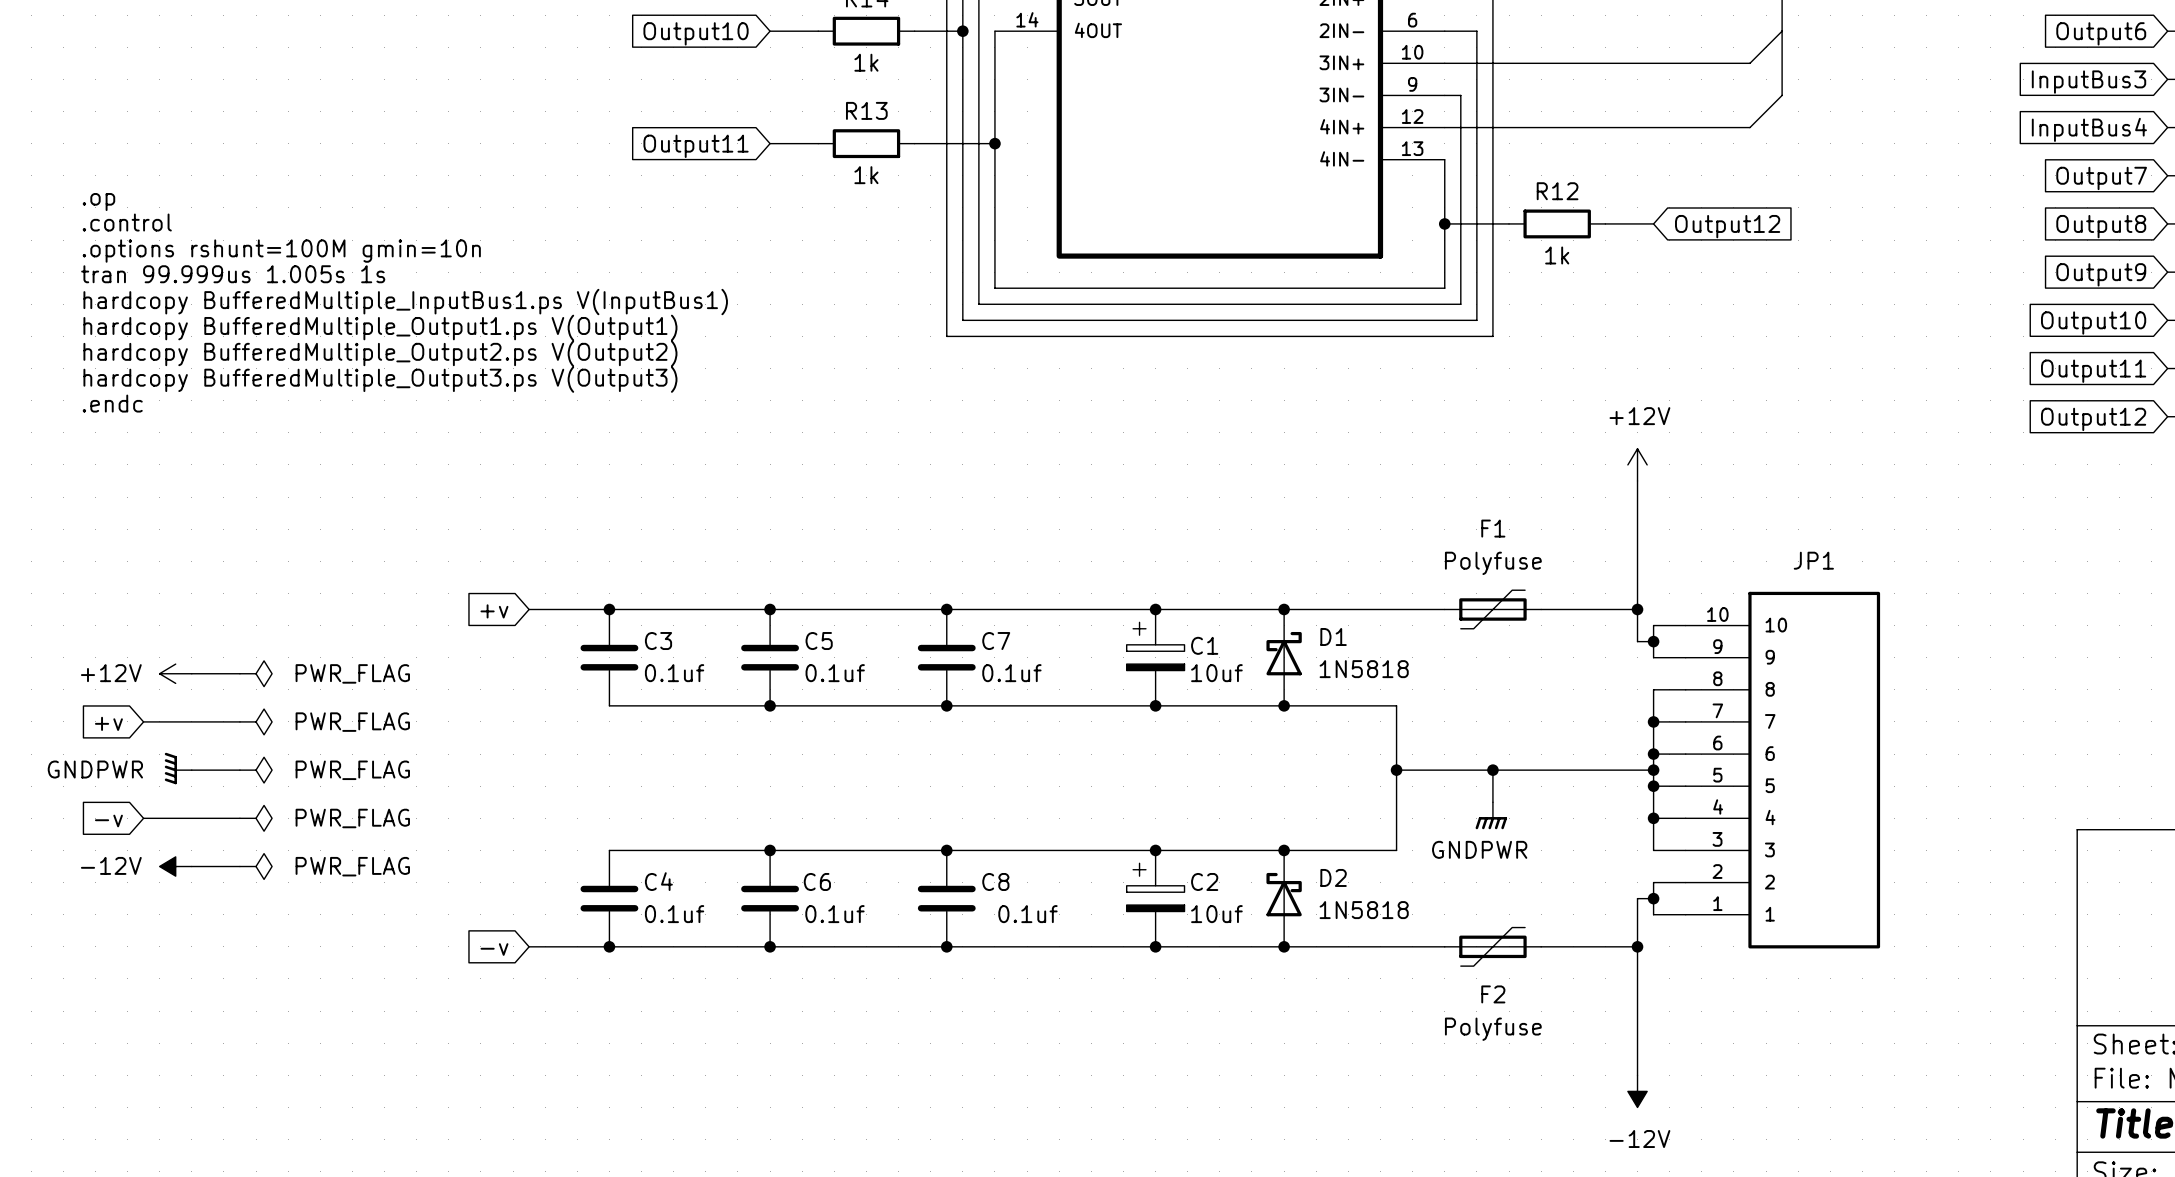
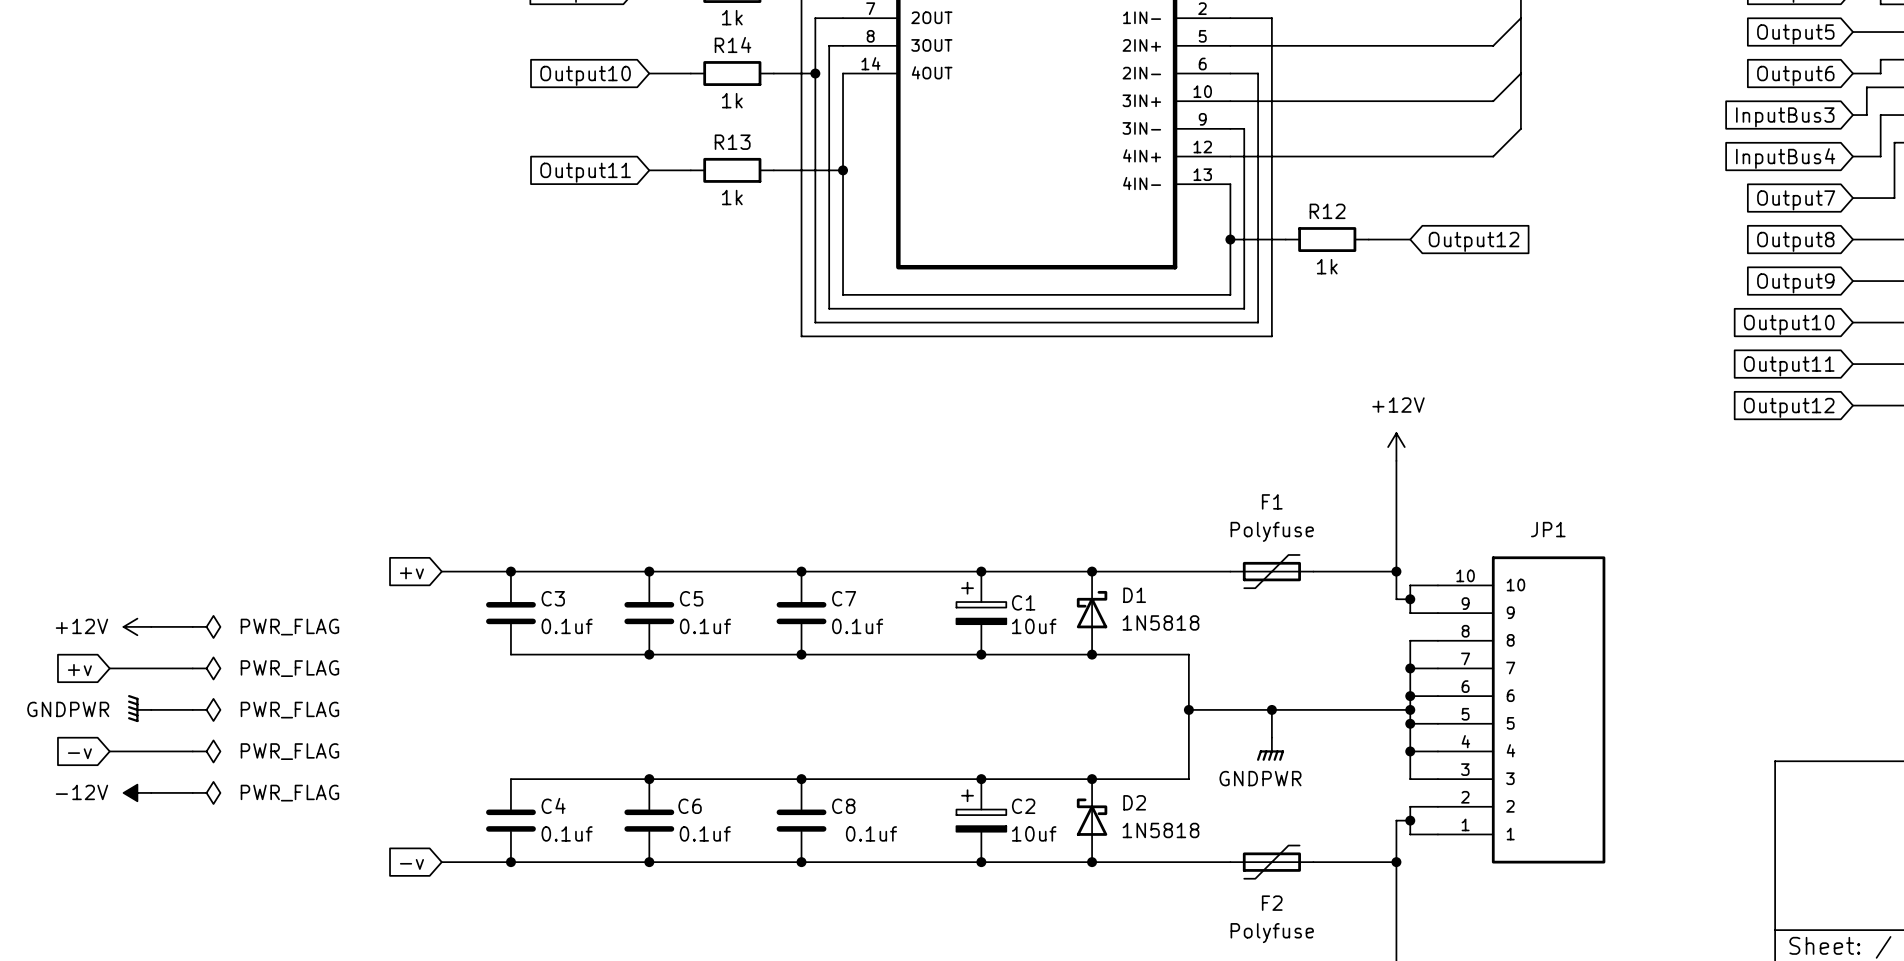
text: .op (98, 202) -> none
text: .control (127, 222) -> none
text: .options rshunt=100M gmin=10n (281, 251) -> none
text: tran 99.999us 1.005s 1s (233, 274) -> none
text: hardcopy BufferedMultiple_InputBus1.ps V(InputBus1) (405, 302) -> none
text: hardcopy BufferedMultiple_Output1.ps V(Output1) (380, 327) -> none
text: hardcopy BufferedMultiple_Output2.ps V(Output2) (380, 353) -> none
text: hardcopy BufferedMultiple_Output3.ps V(Output3) (380, 379) -> none
text: .endc (112, 403) -> none

